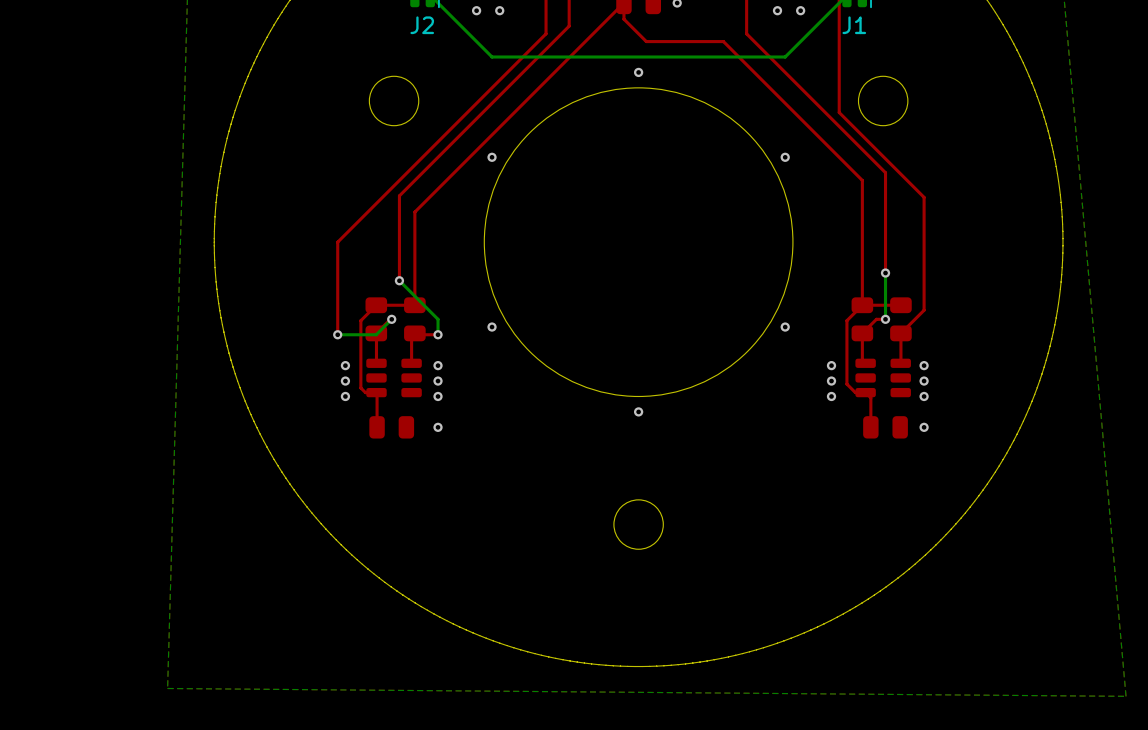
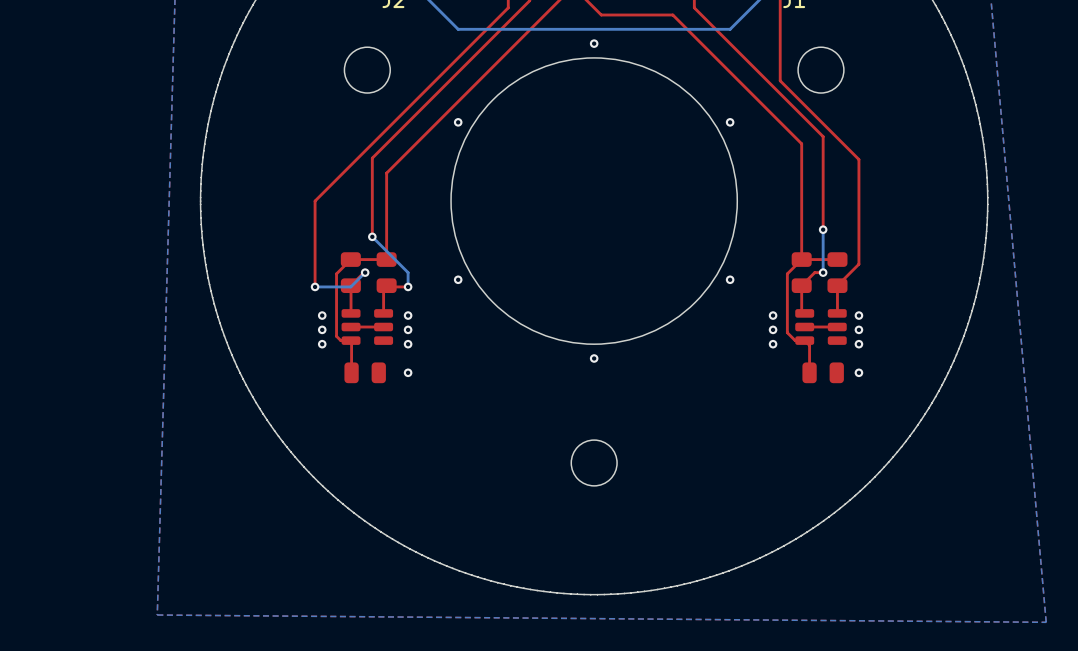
top track: none -> (383, 327) (351, 327)
top track: none -> (837, 327) (804, 327)

